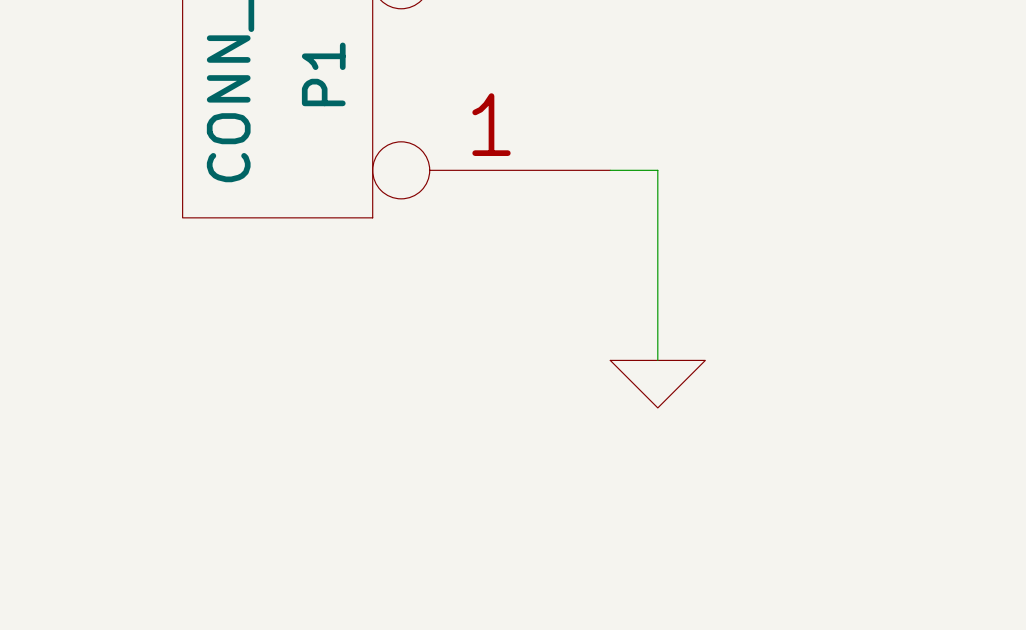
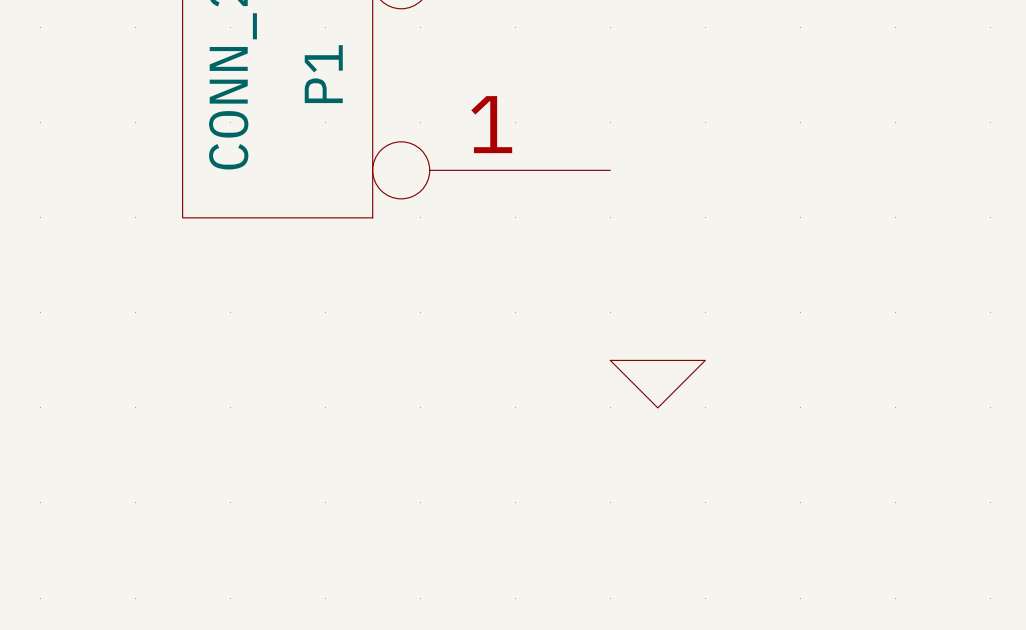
wire: (610, 170) (657, 170) (657, 360) -> none

